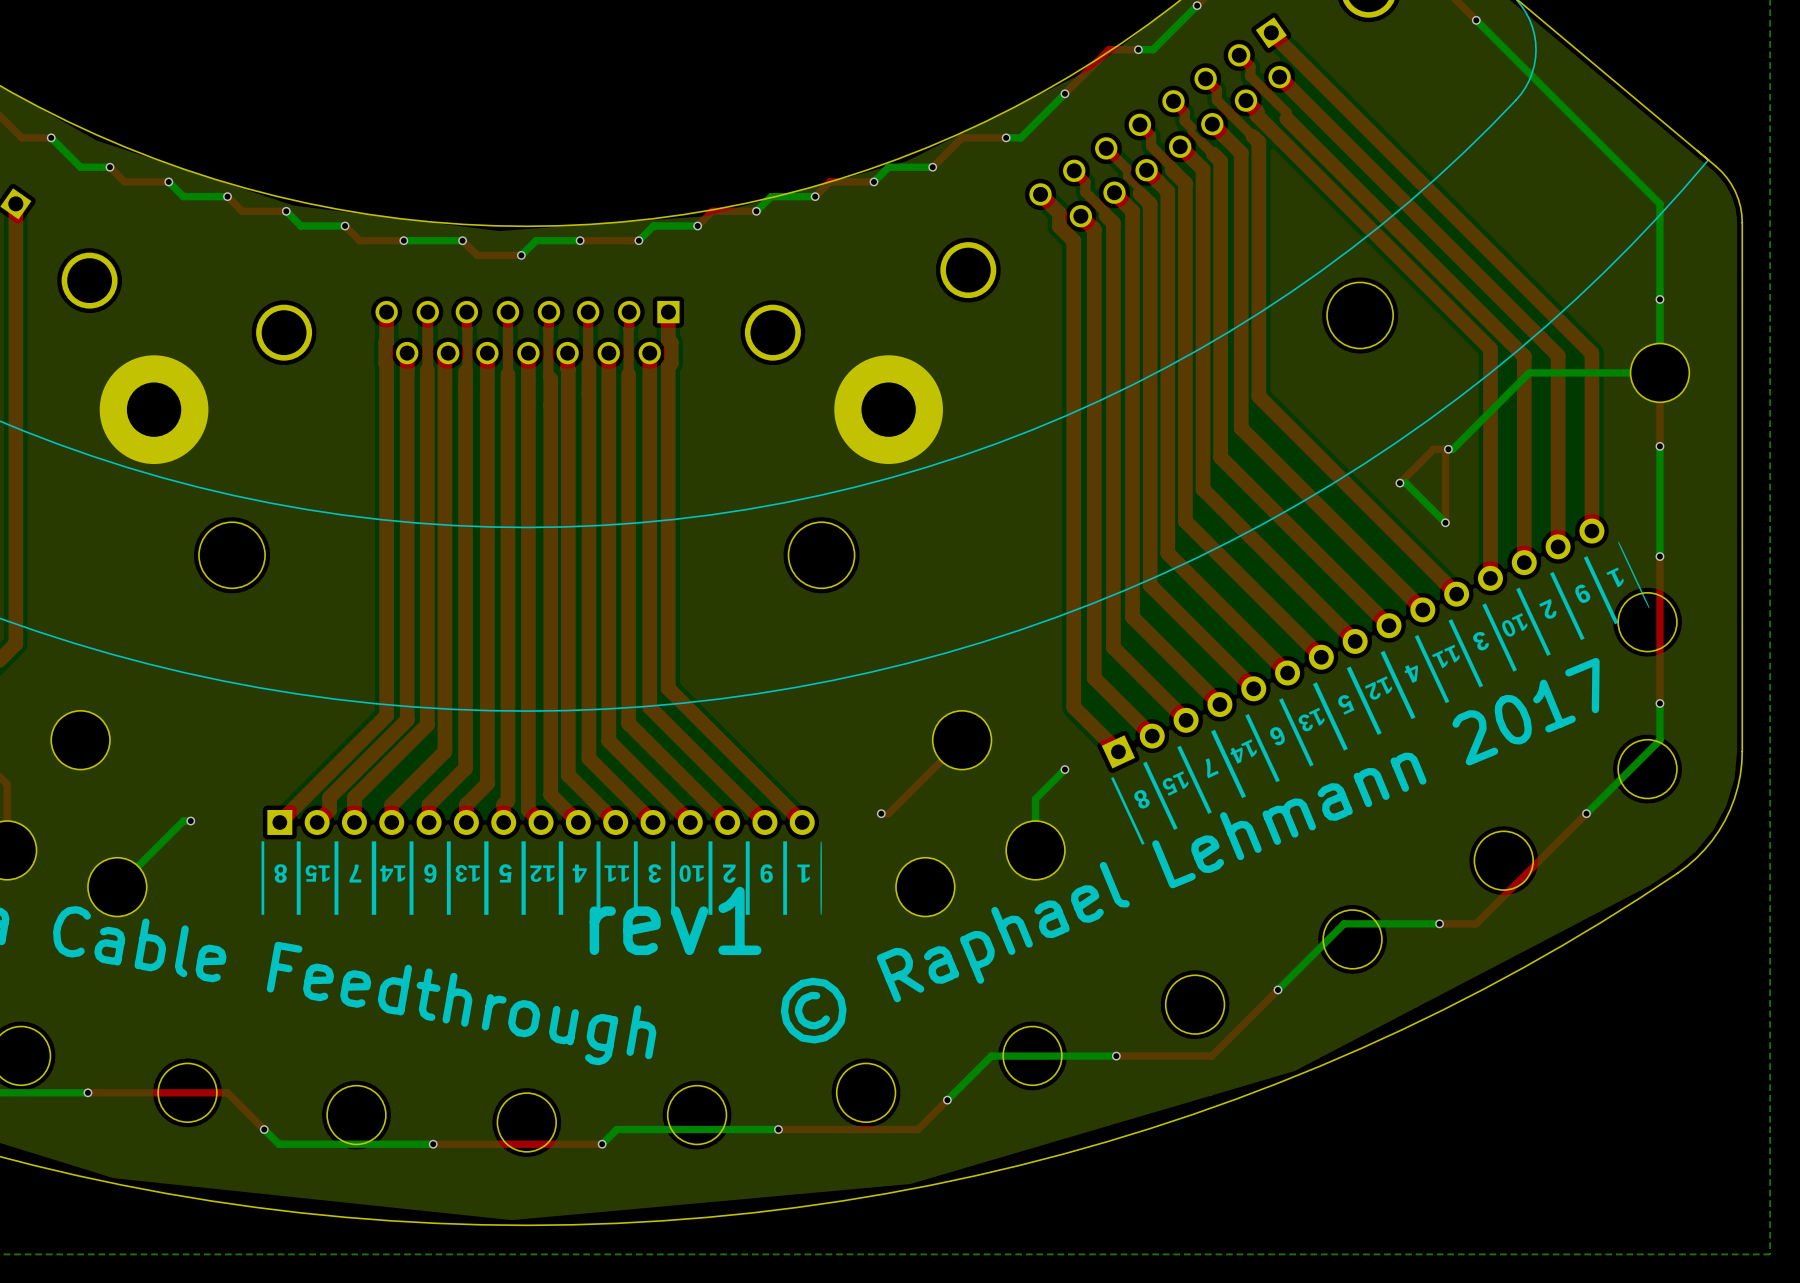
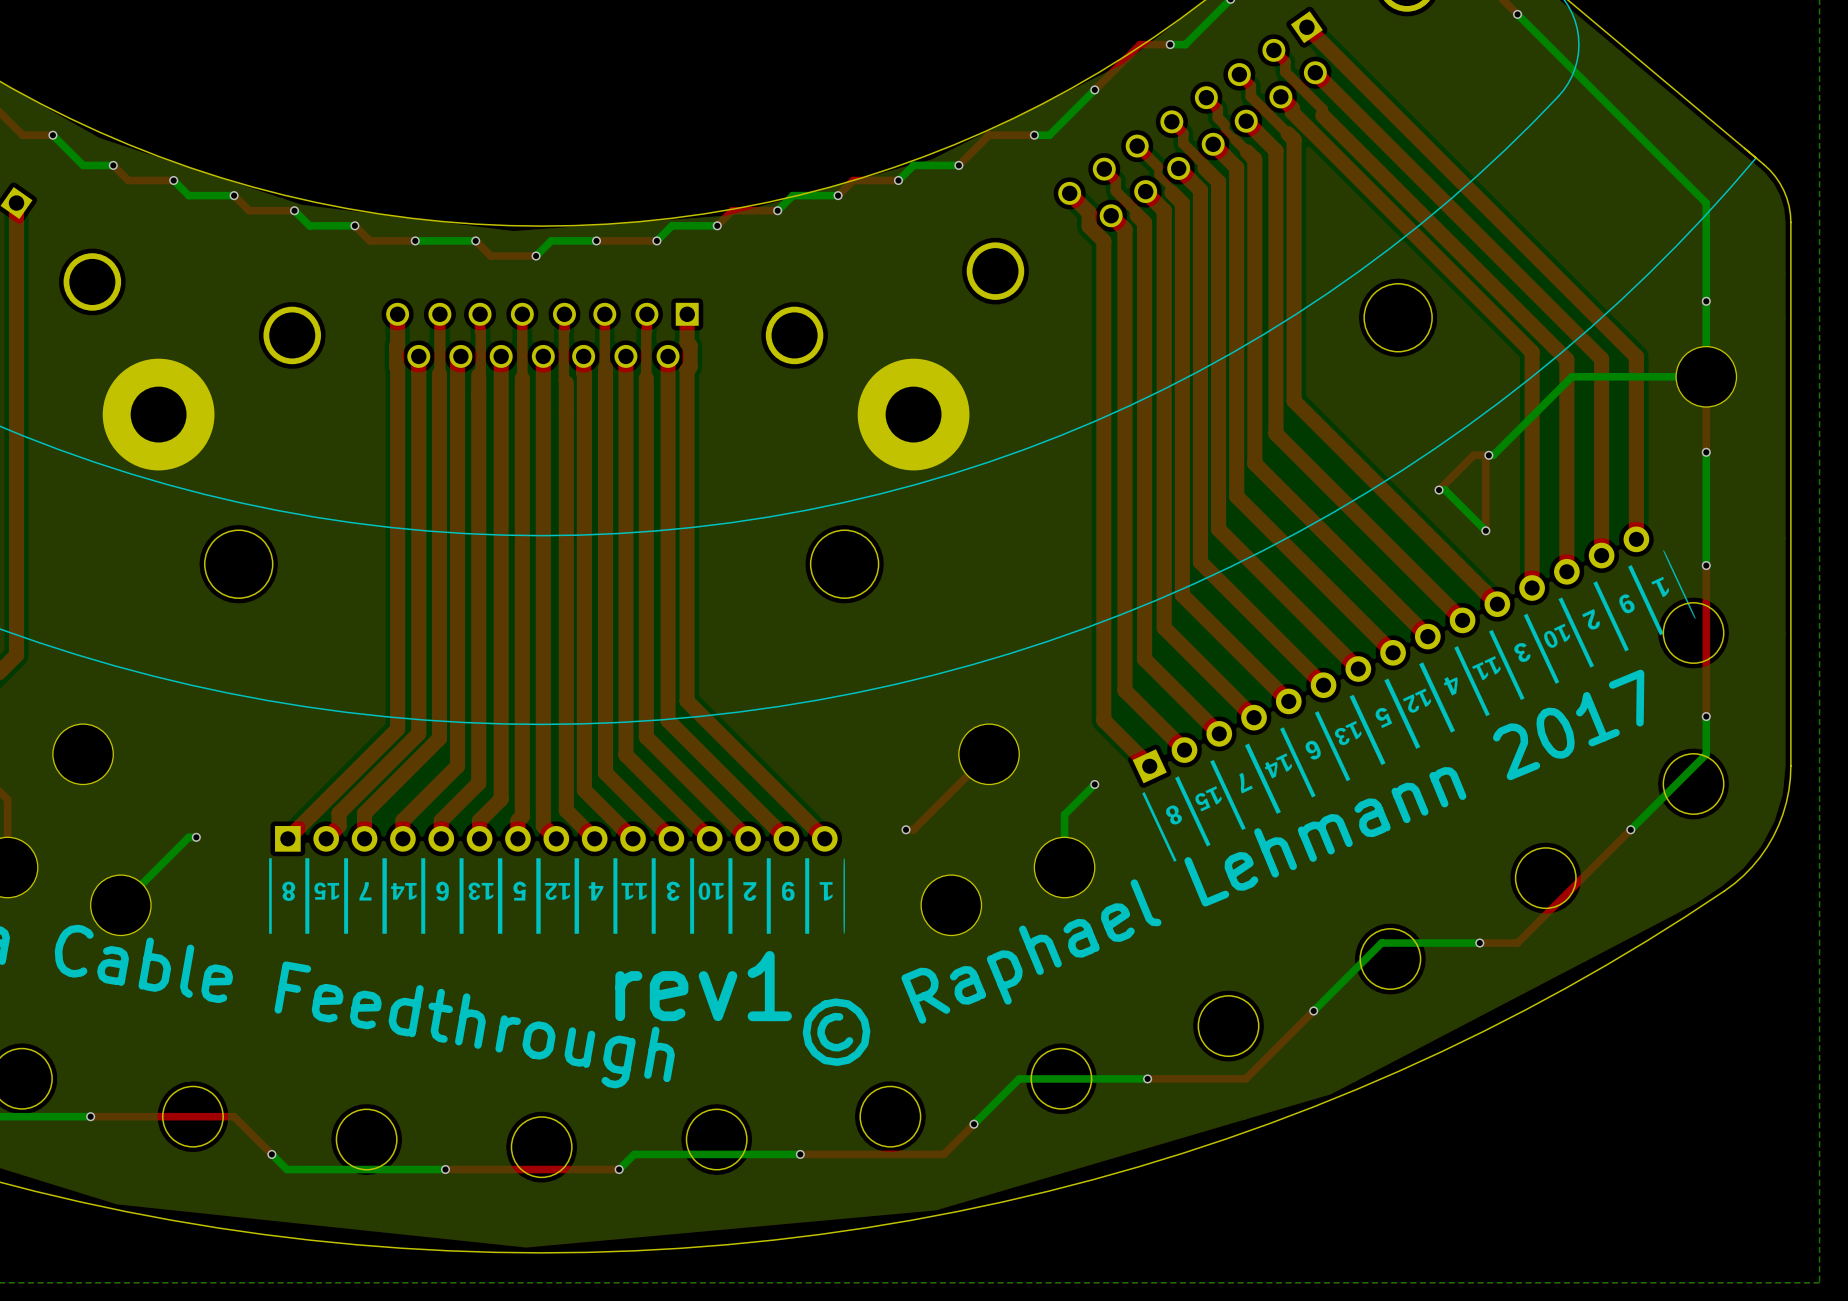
text position: rev1 (675, 920) -> rev1 (703, 986)

